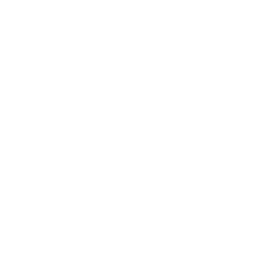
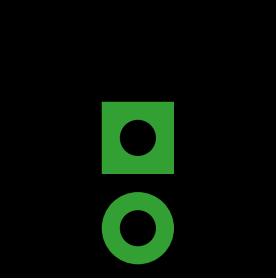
part: none -> (137, 183)

